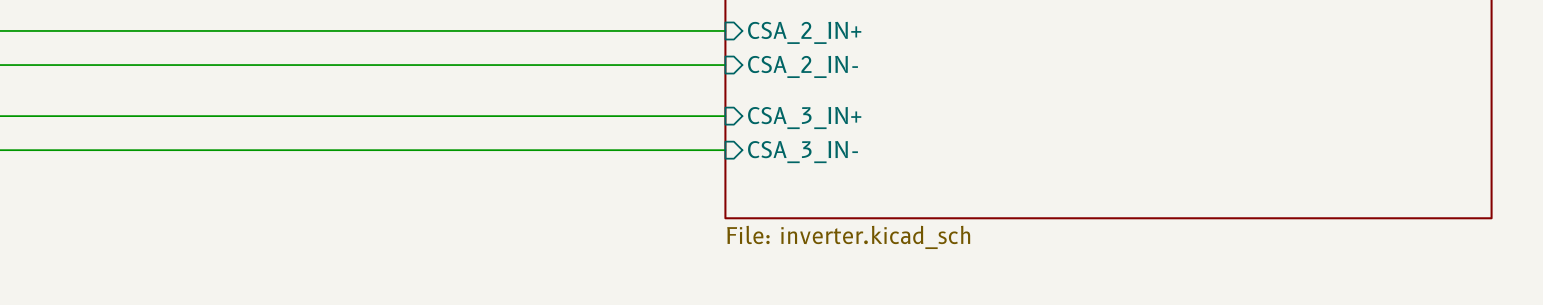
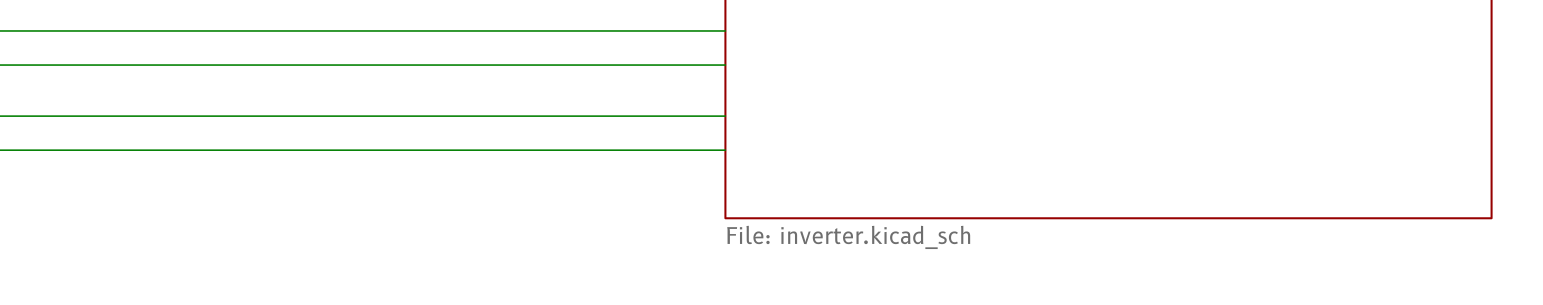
sheet pin: CSA_2_IN+ (804, 32) -> none
sheet pin: CSA_2_IN- (802, 66) -> none
sheet pin: CSA_3_IN+ (804, 118) -> none
sheet pin: CSA_3_IN- (802, 152) -> none

